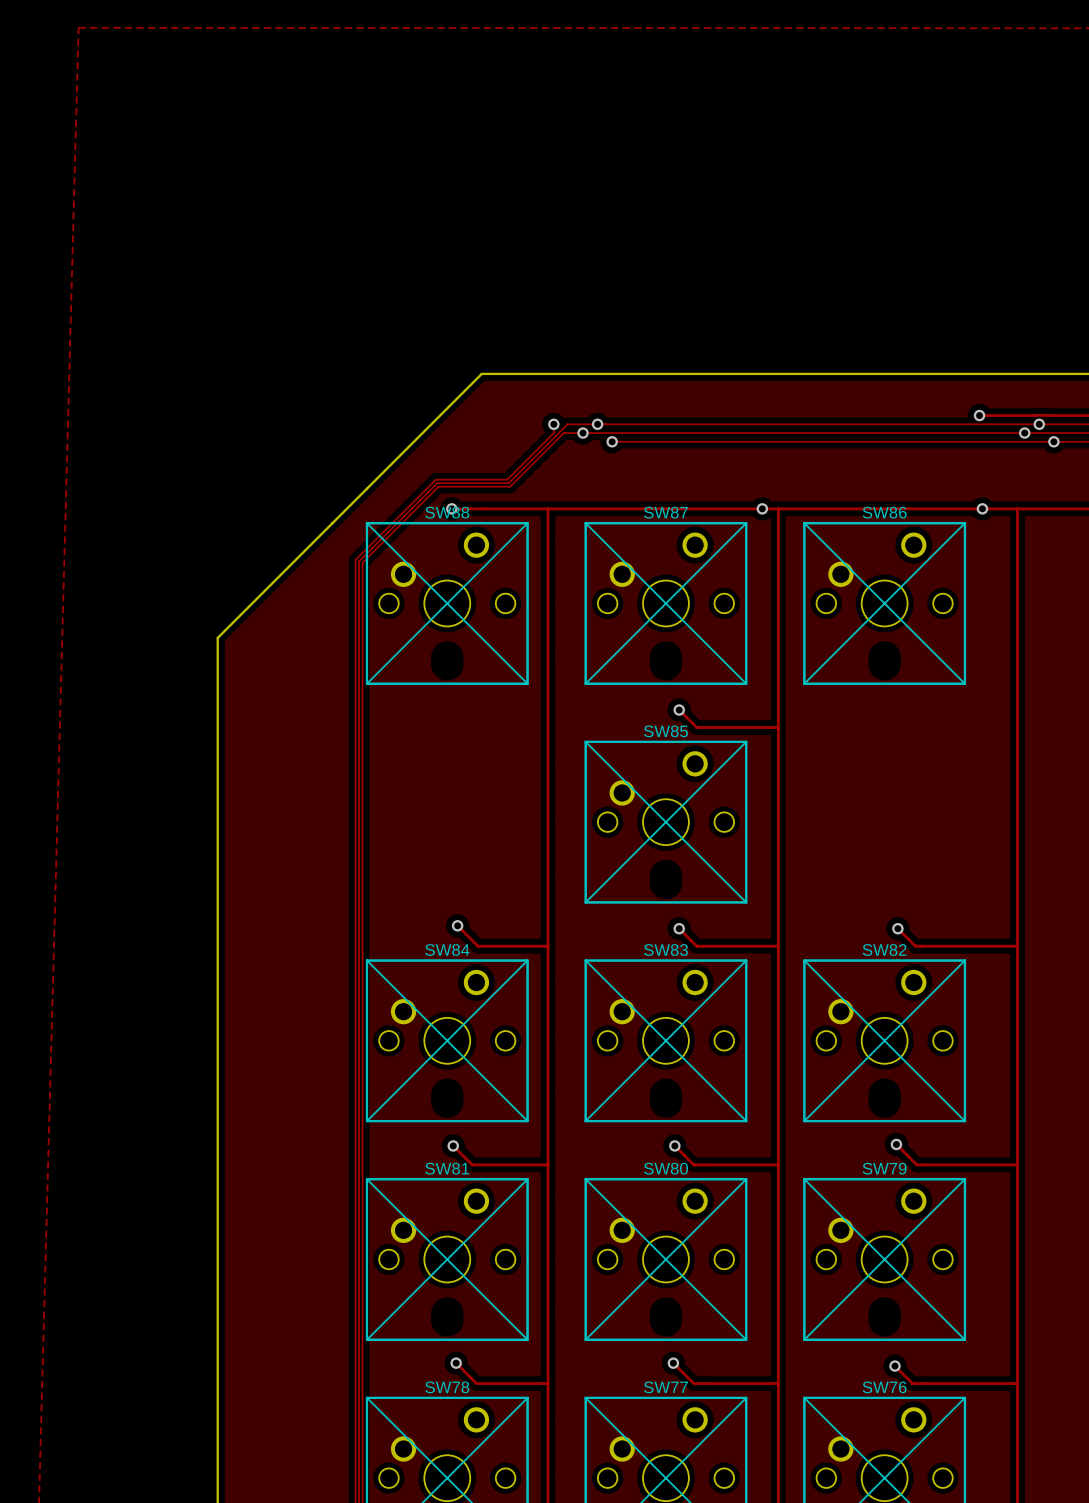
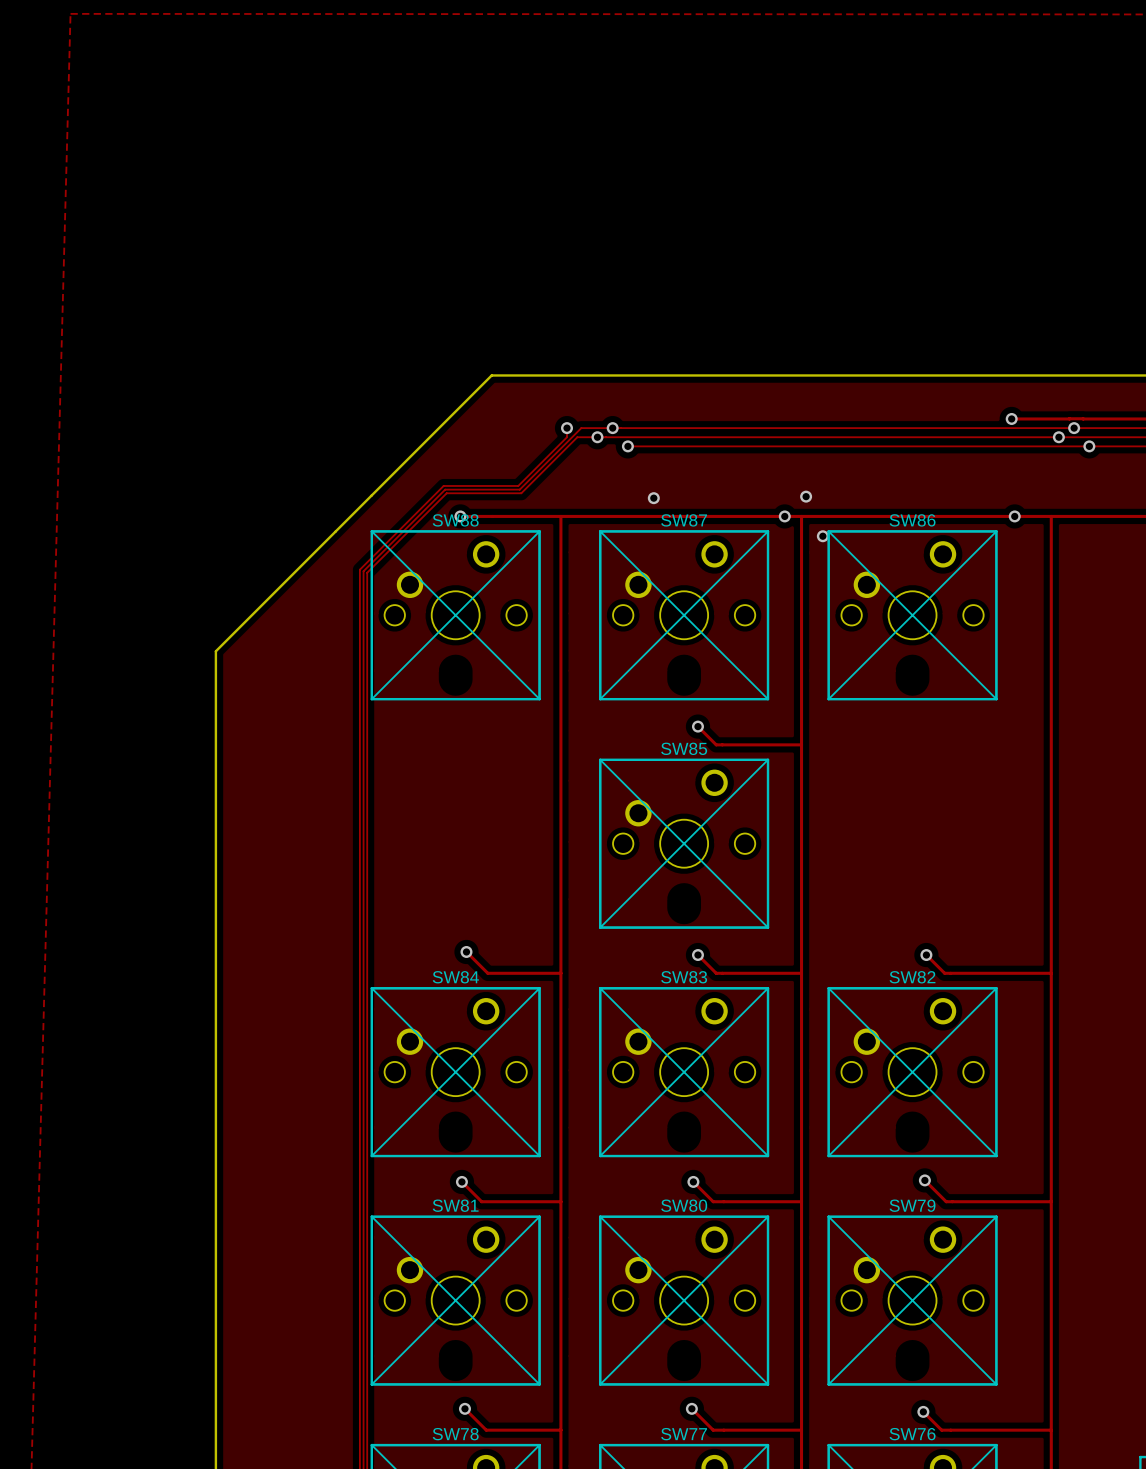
via: none -> (806, 496)
via: none -> (653, 498)
via: none -> (822, 536)

